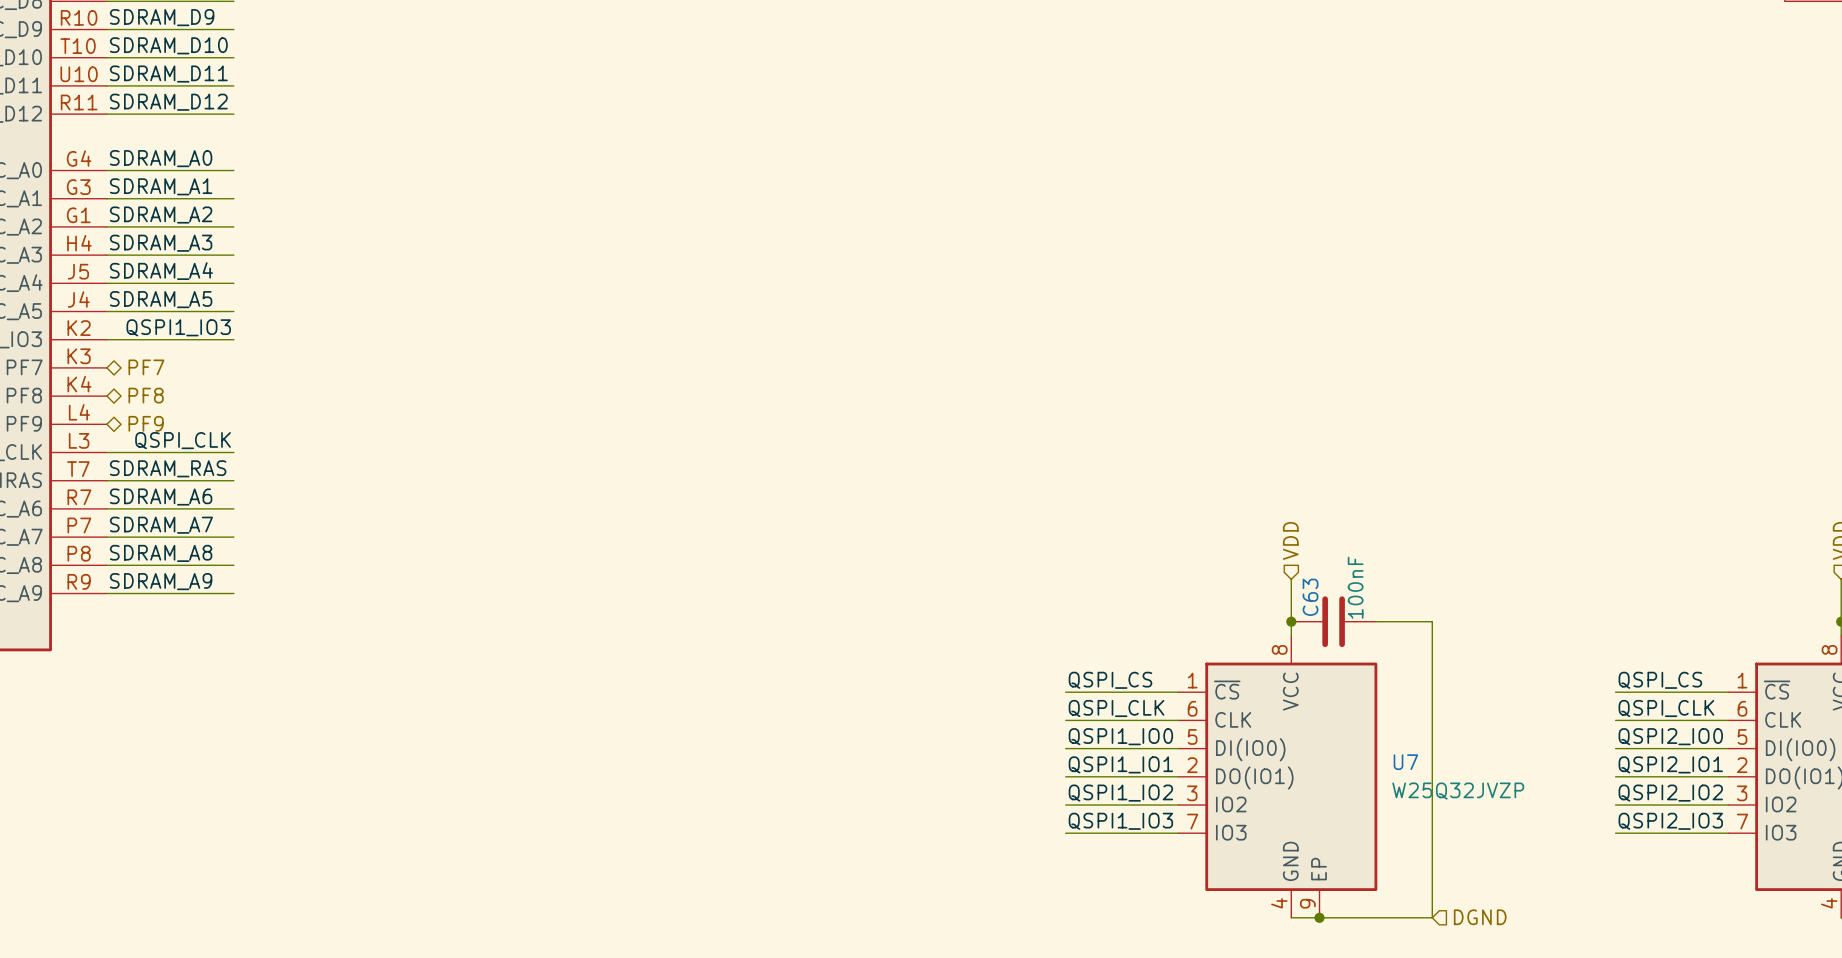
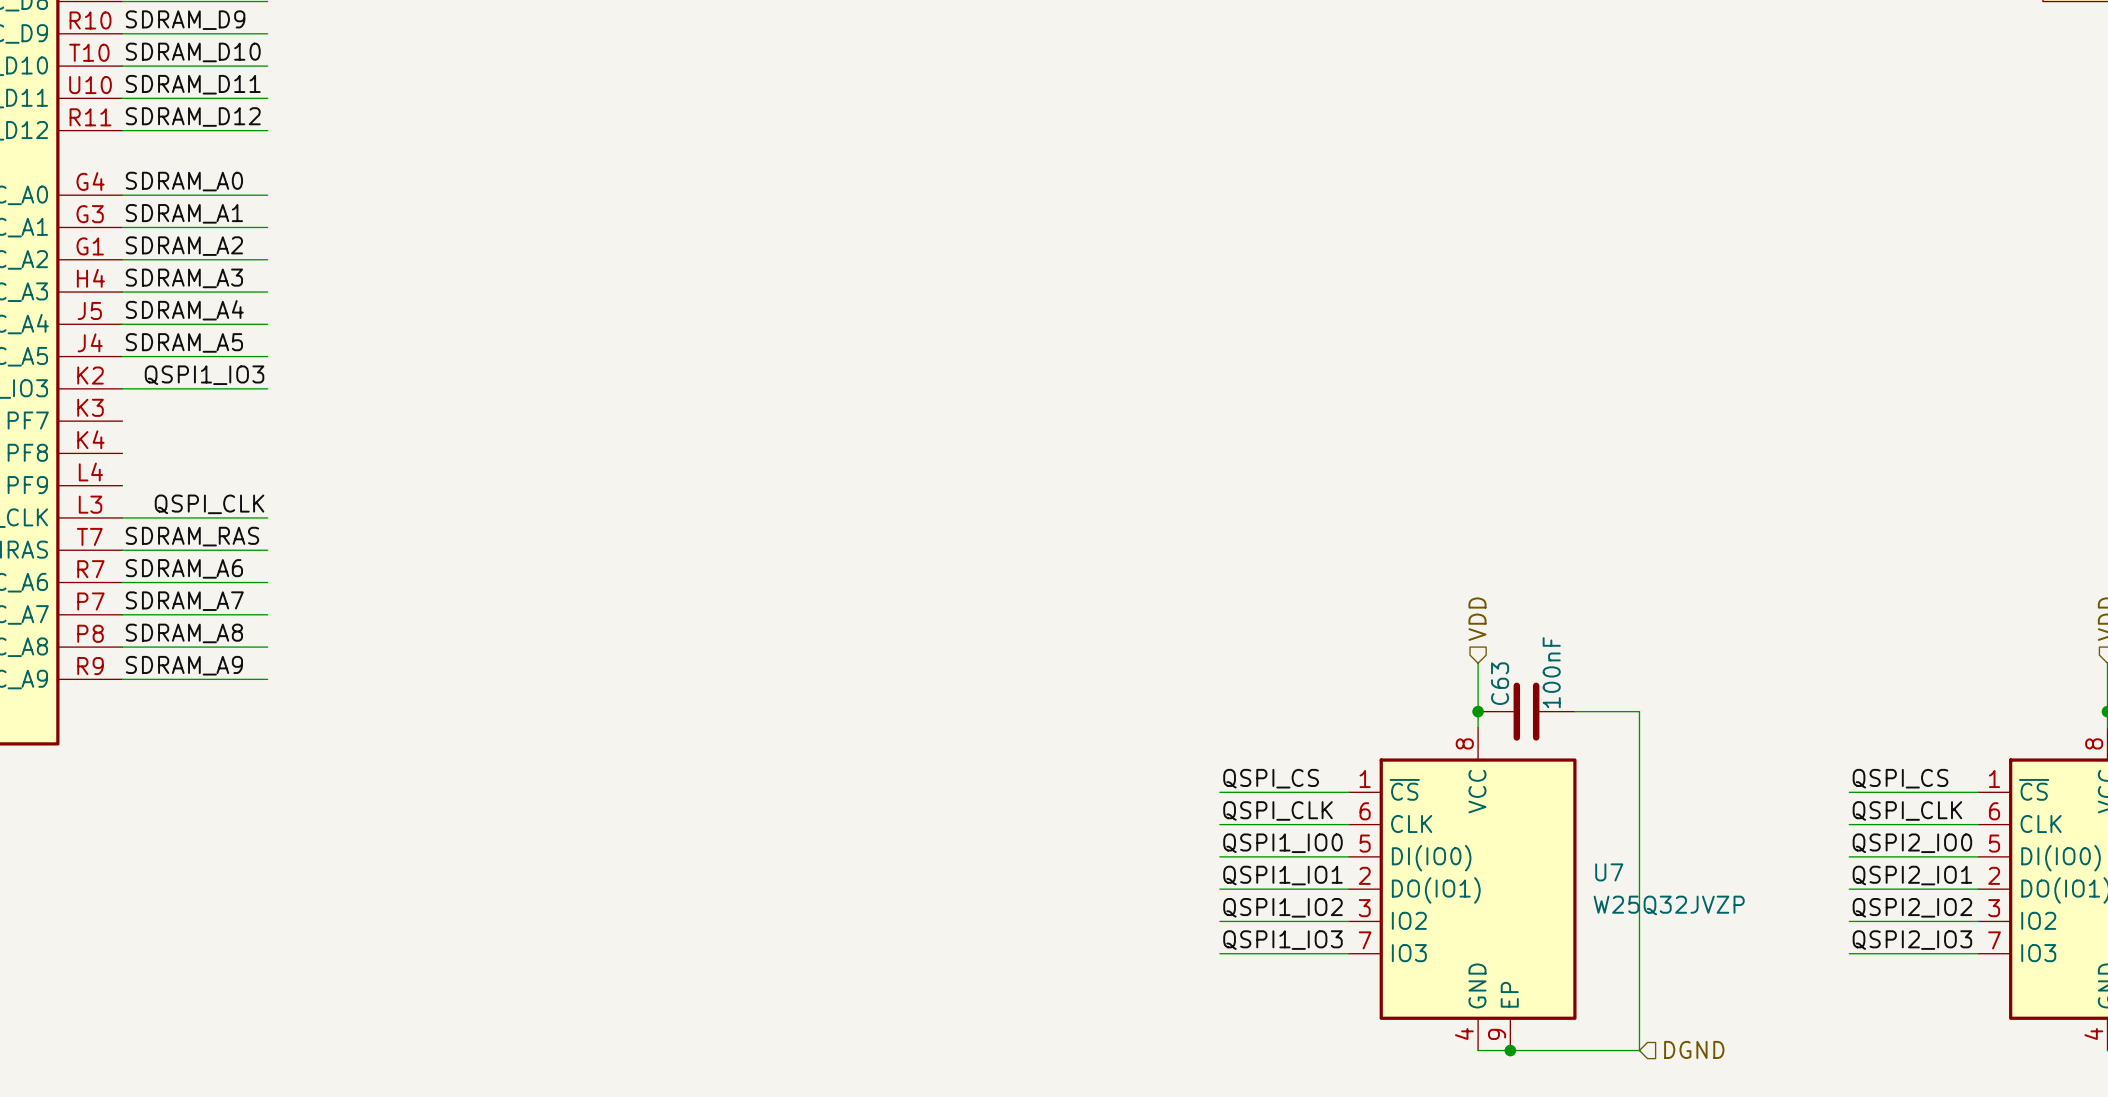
hierarchical label: PF7 (146, 367) -> none
hierarchical label: PF8 (146, 395) -> none
hierarchical label: PF9 (146, 423) -> none

